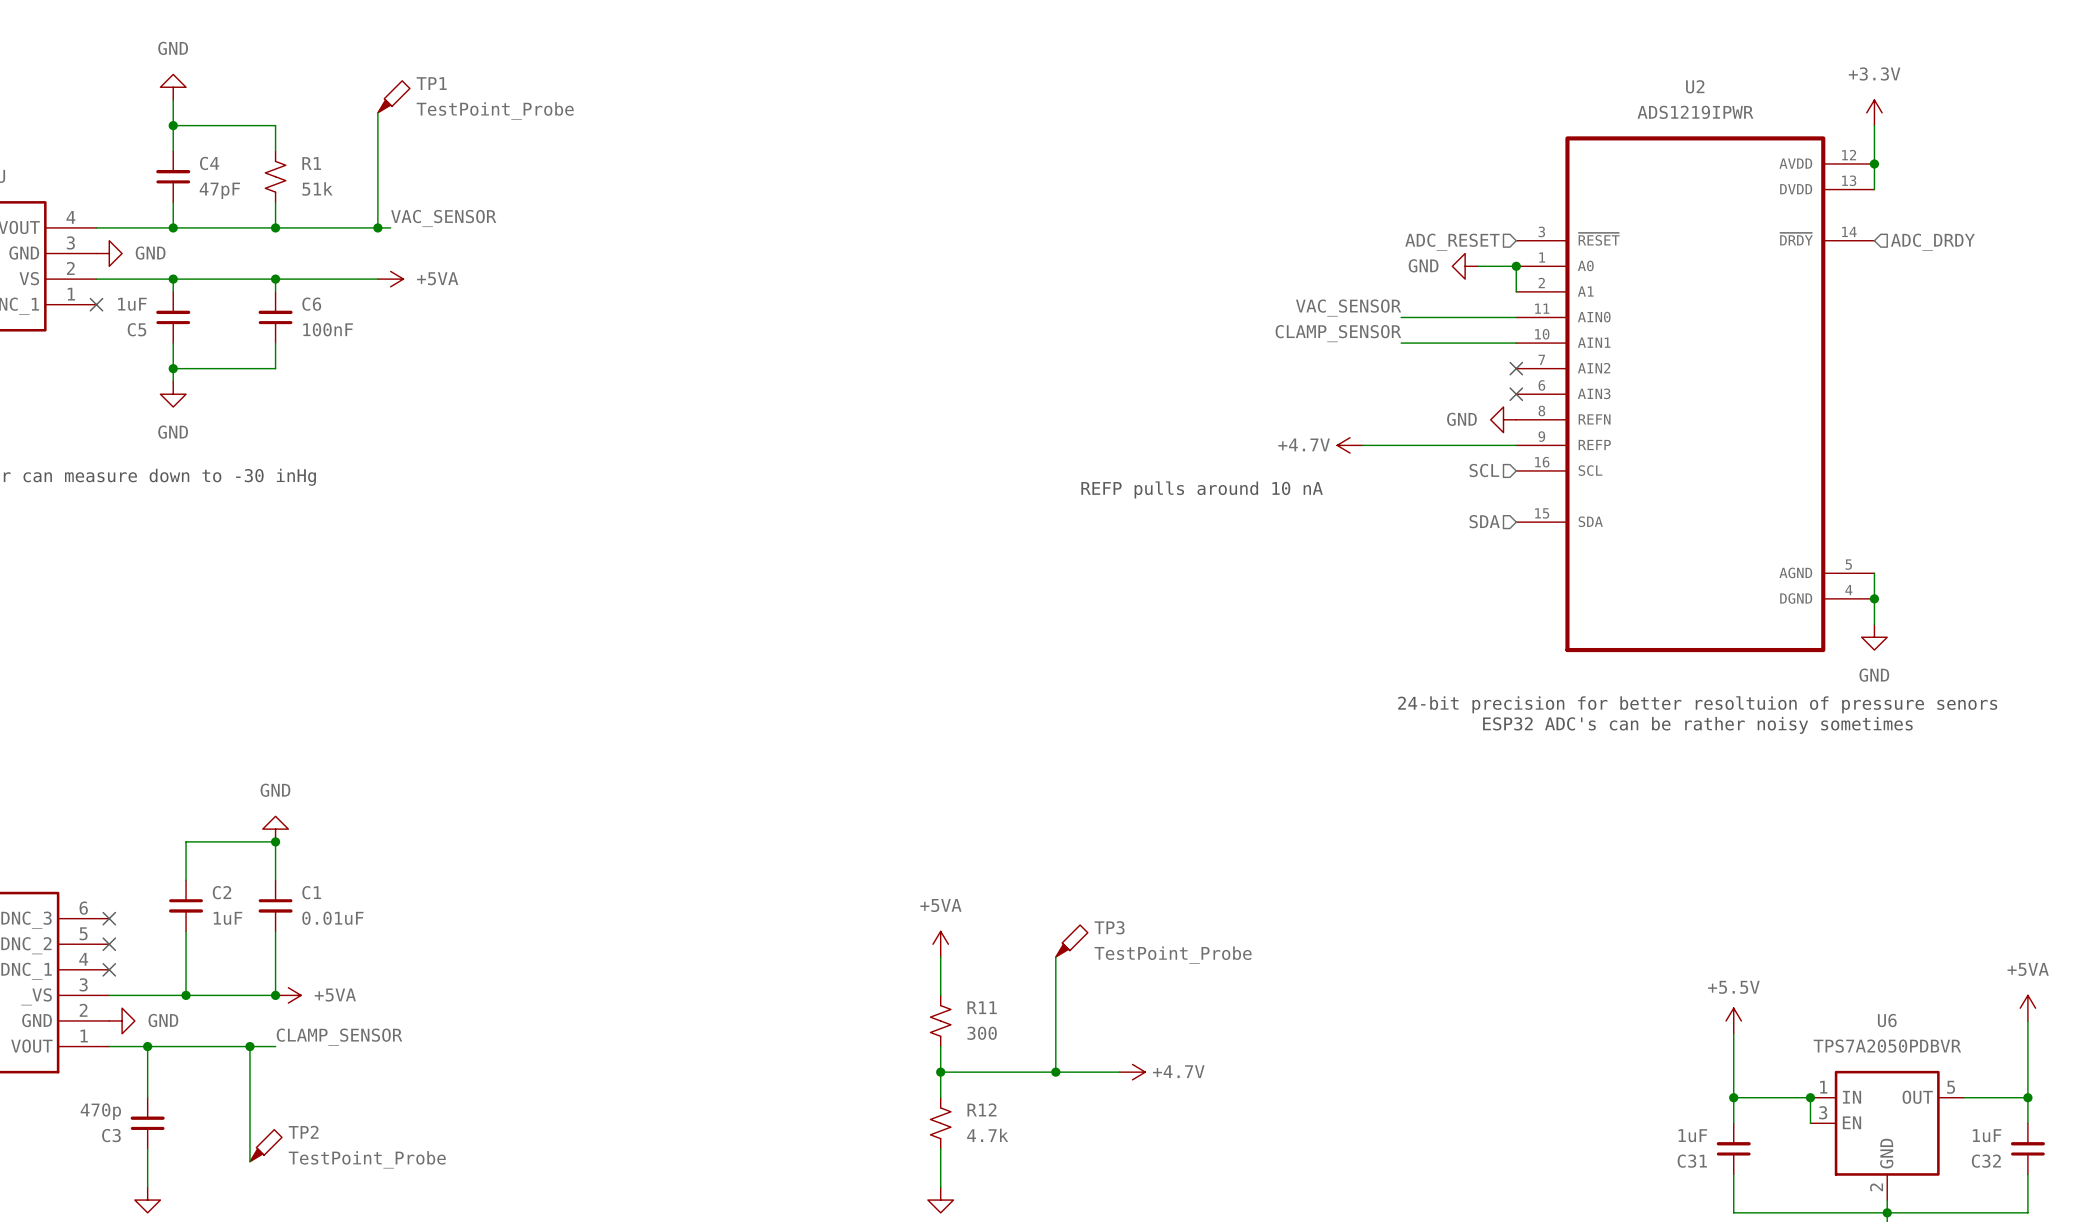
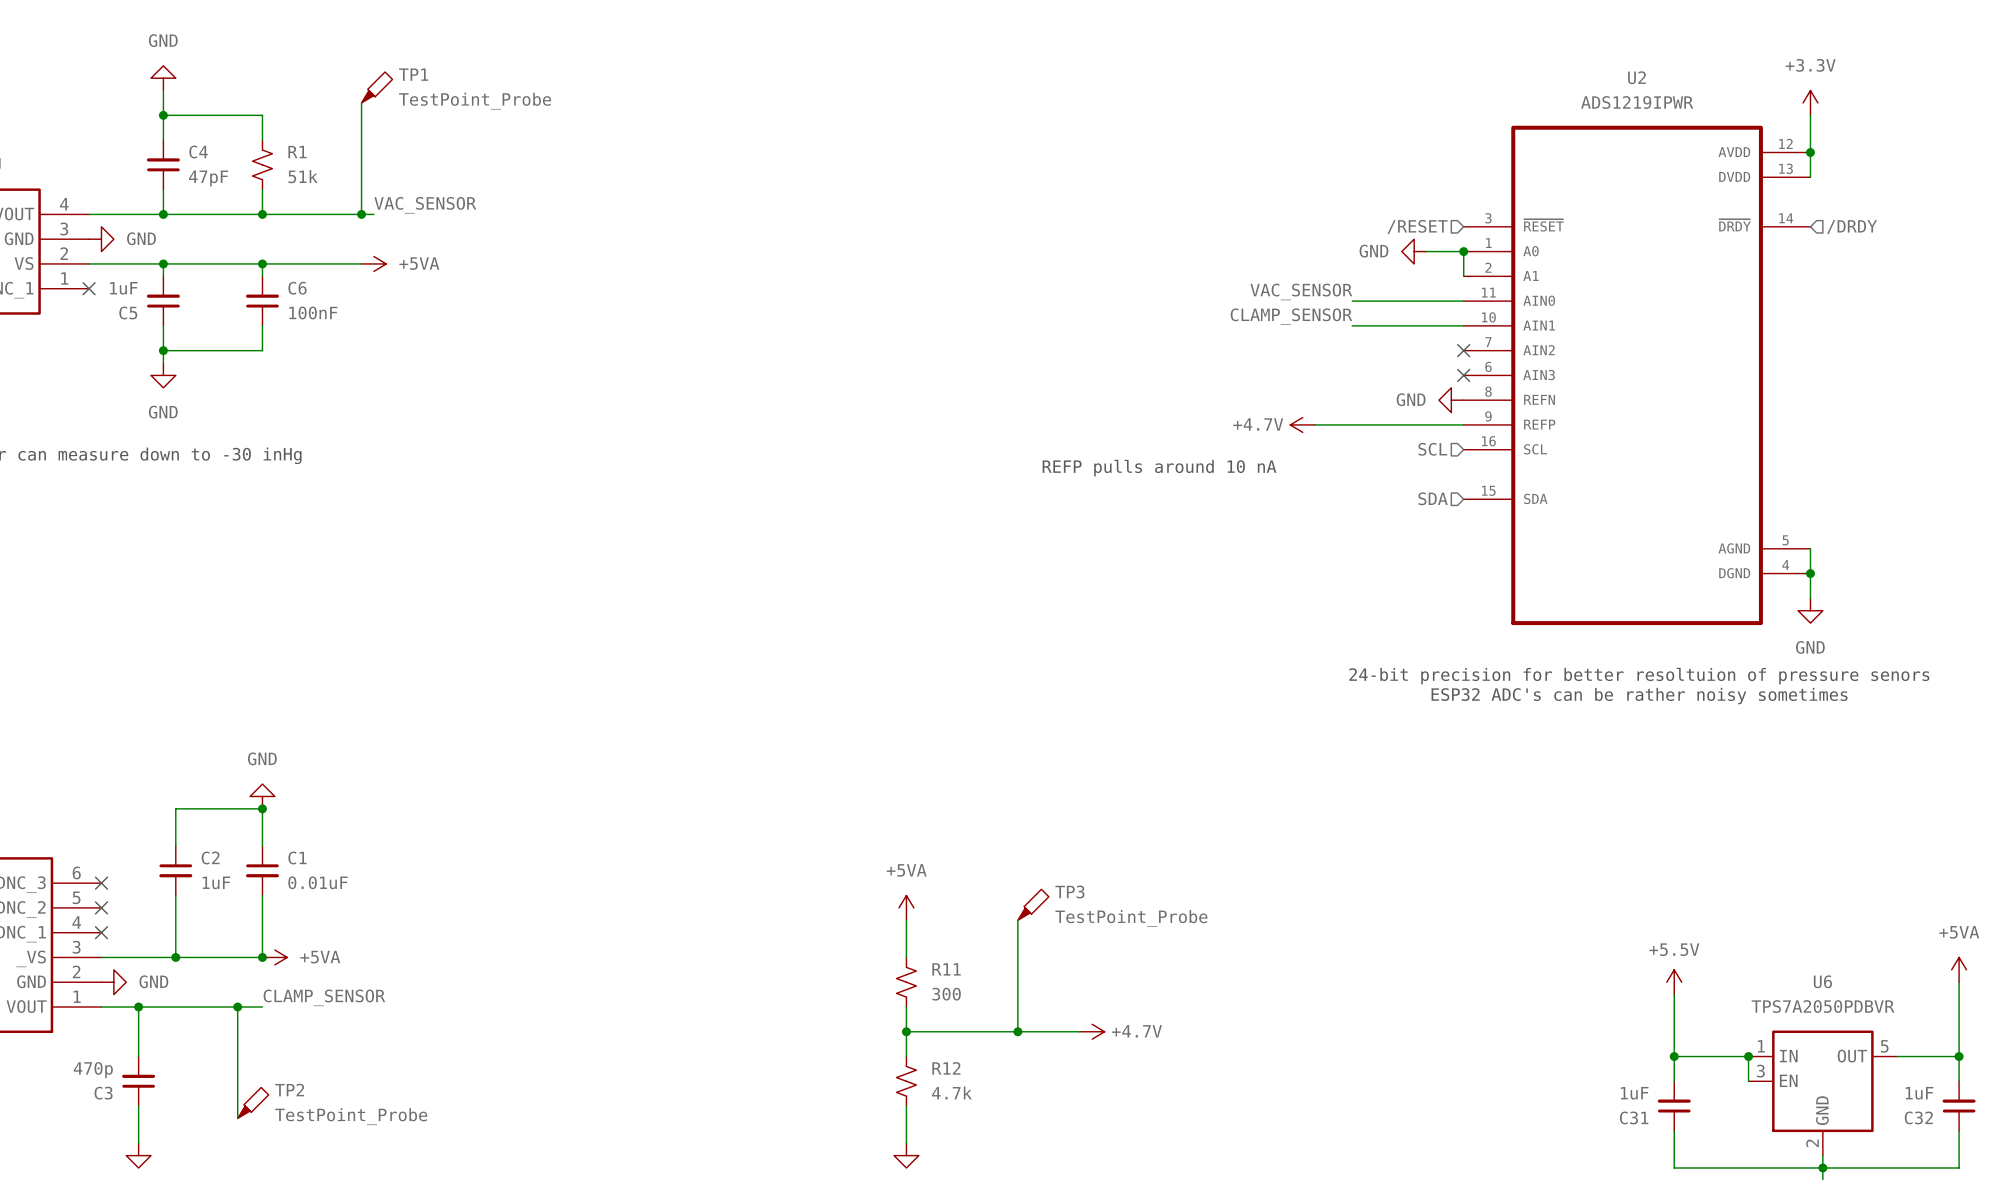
hierarchical label: ADC_RESET (1452, 242) -> /RESET (1417, 227)
hierarchical label: ADC_DRDY (1932, 242) -> /DRDY (1852, 227)

